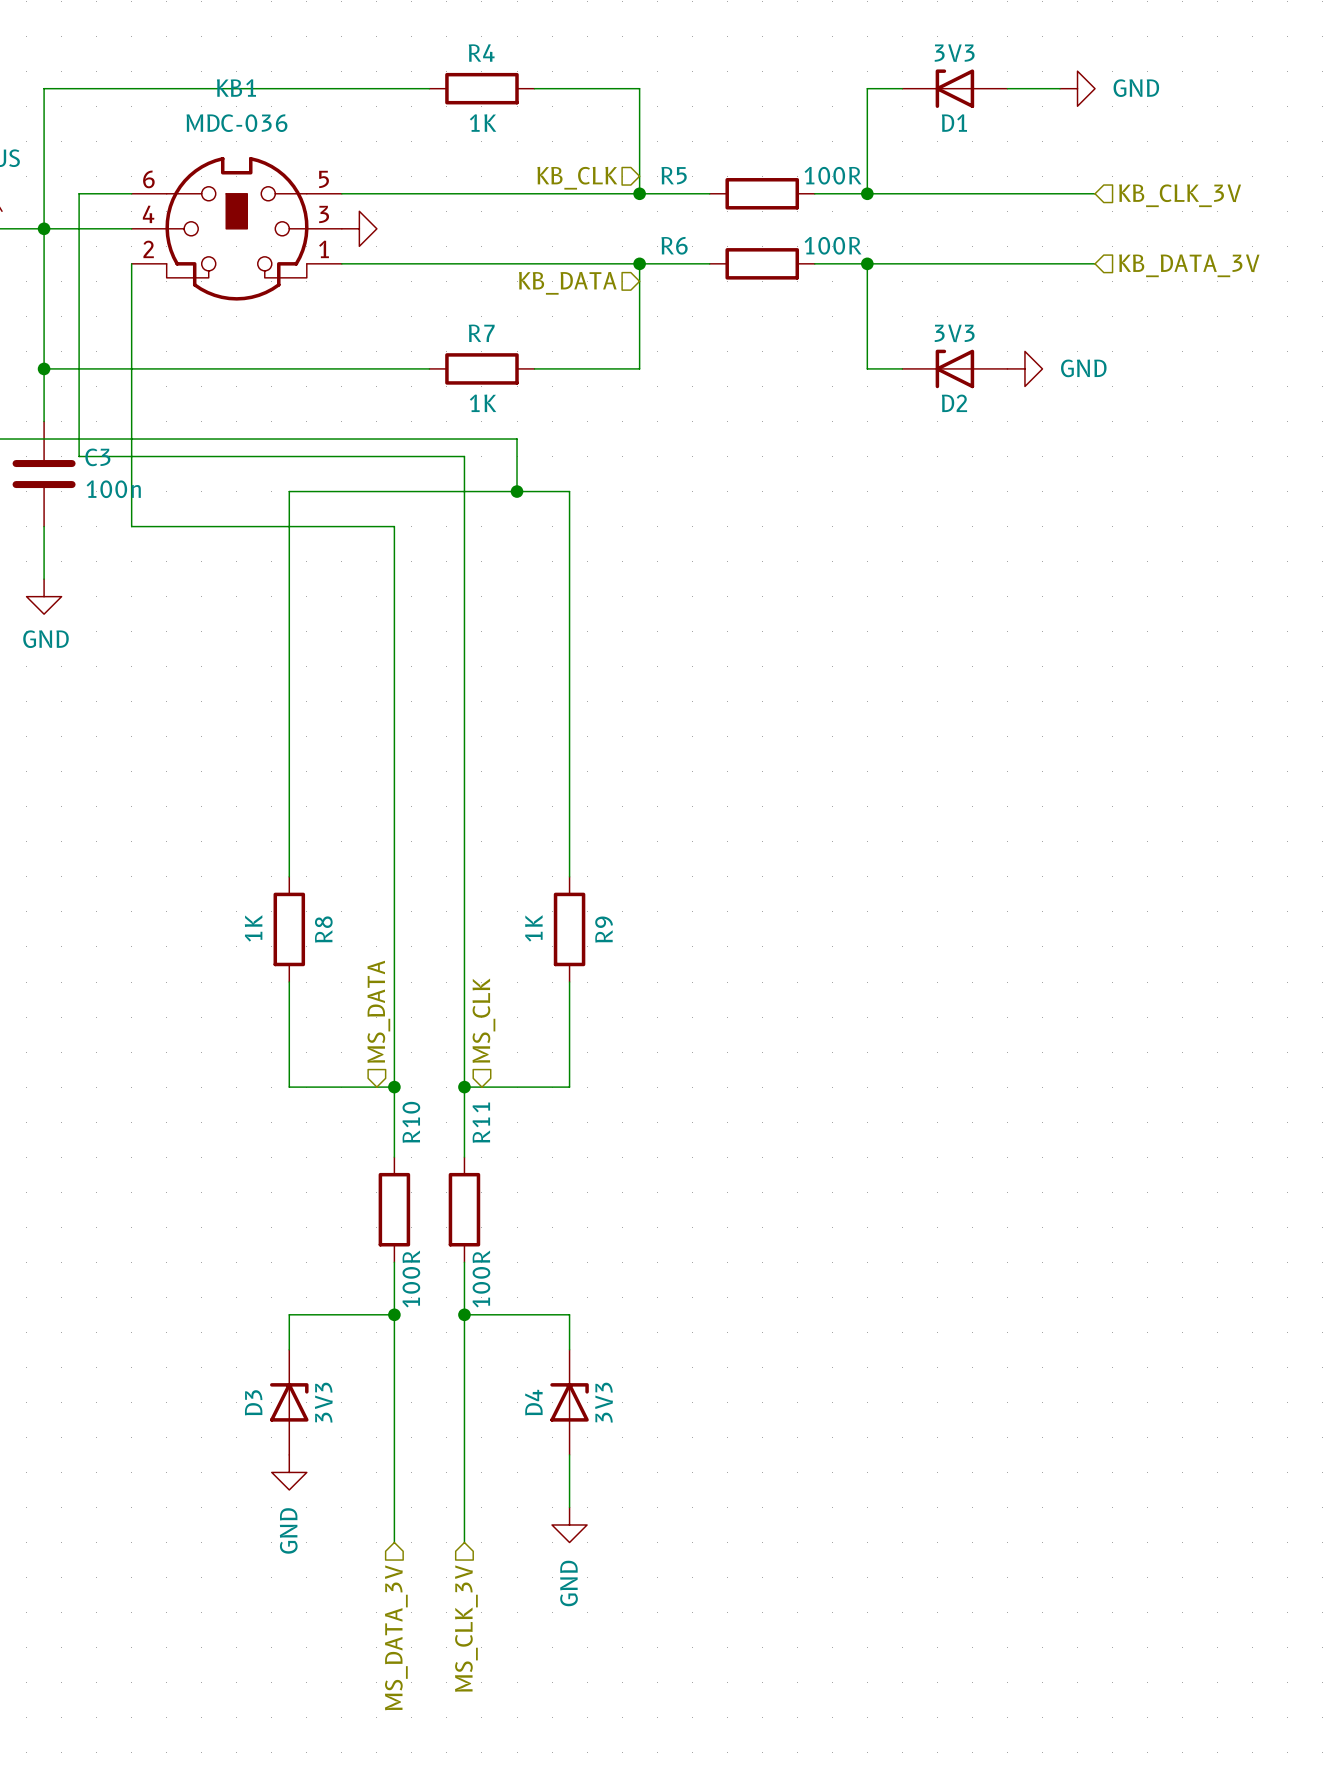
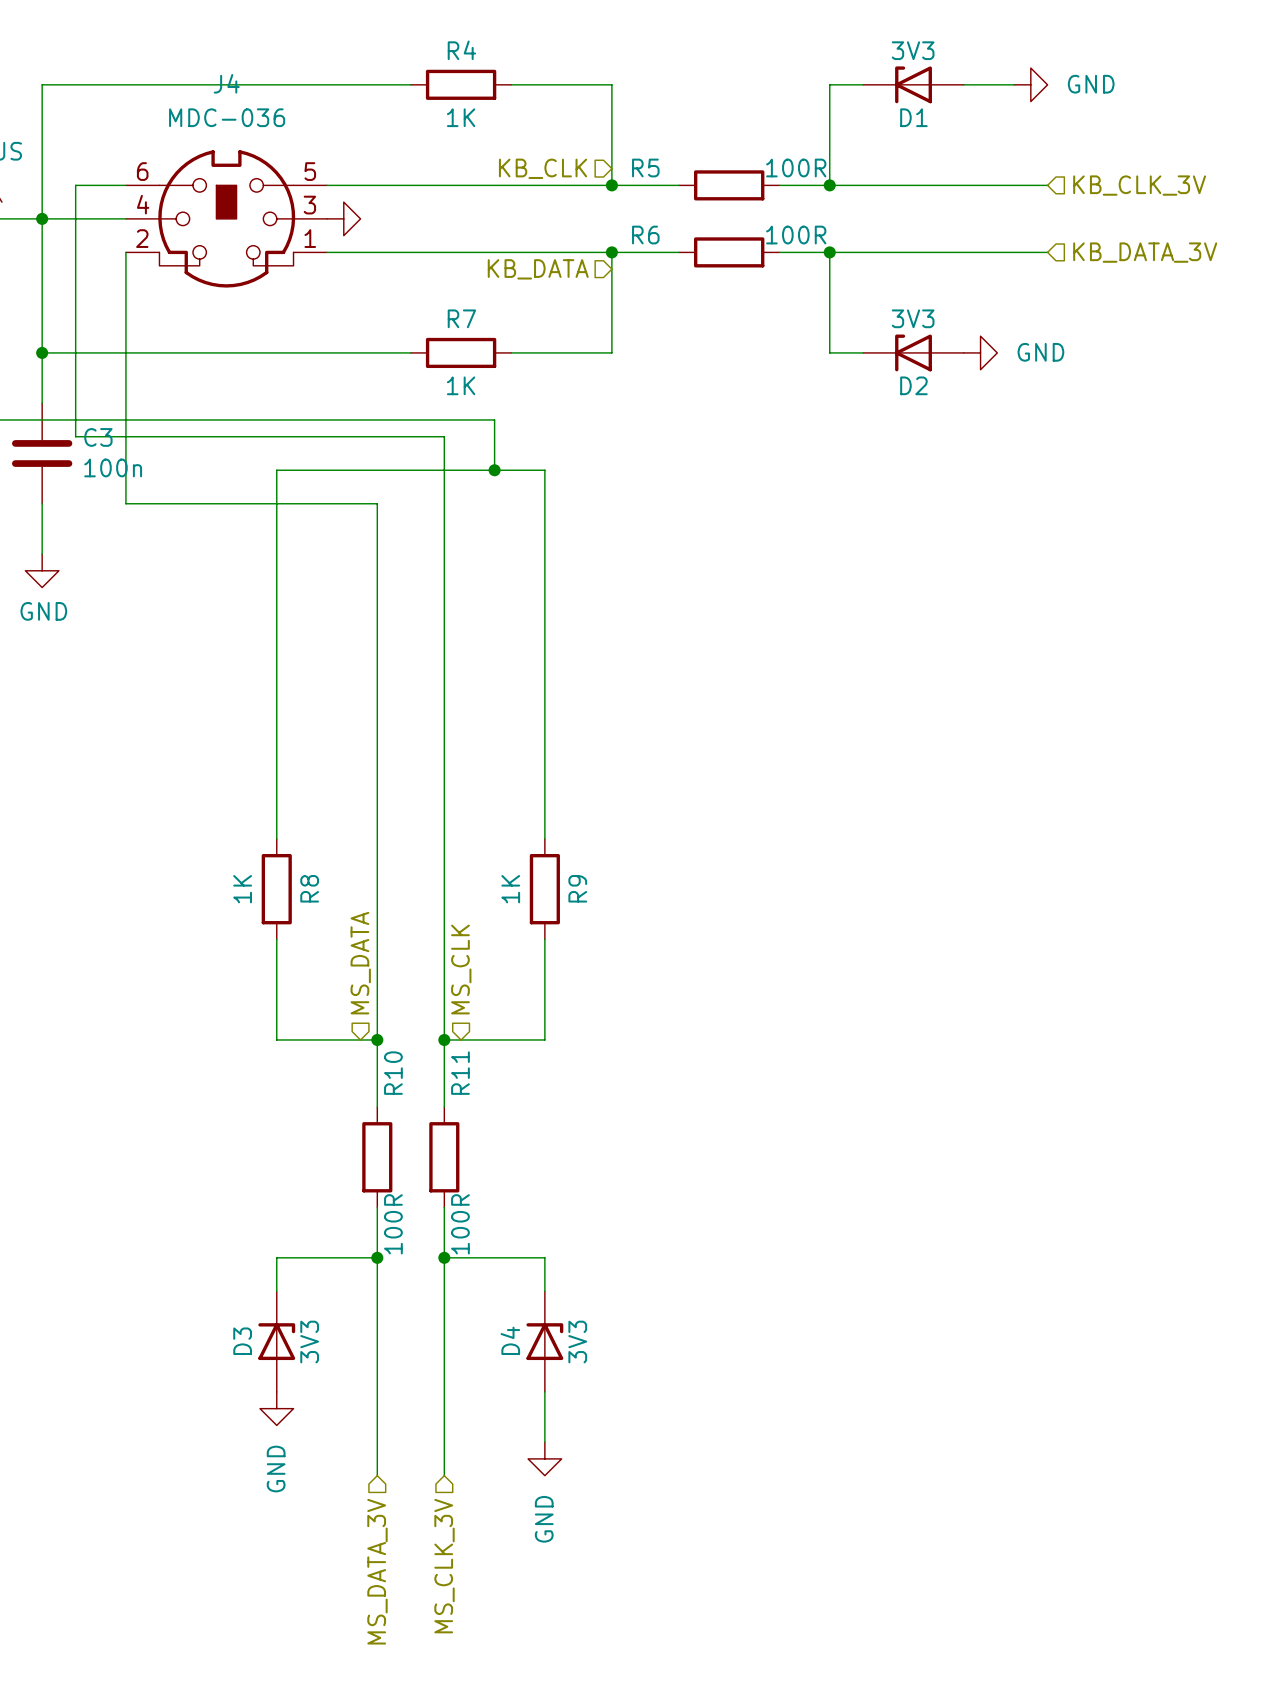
KB1 name: KB1 (236, 88) -> J4 (226, 83)

